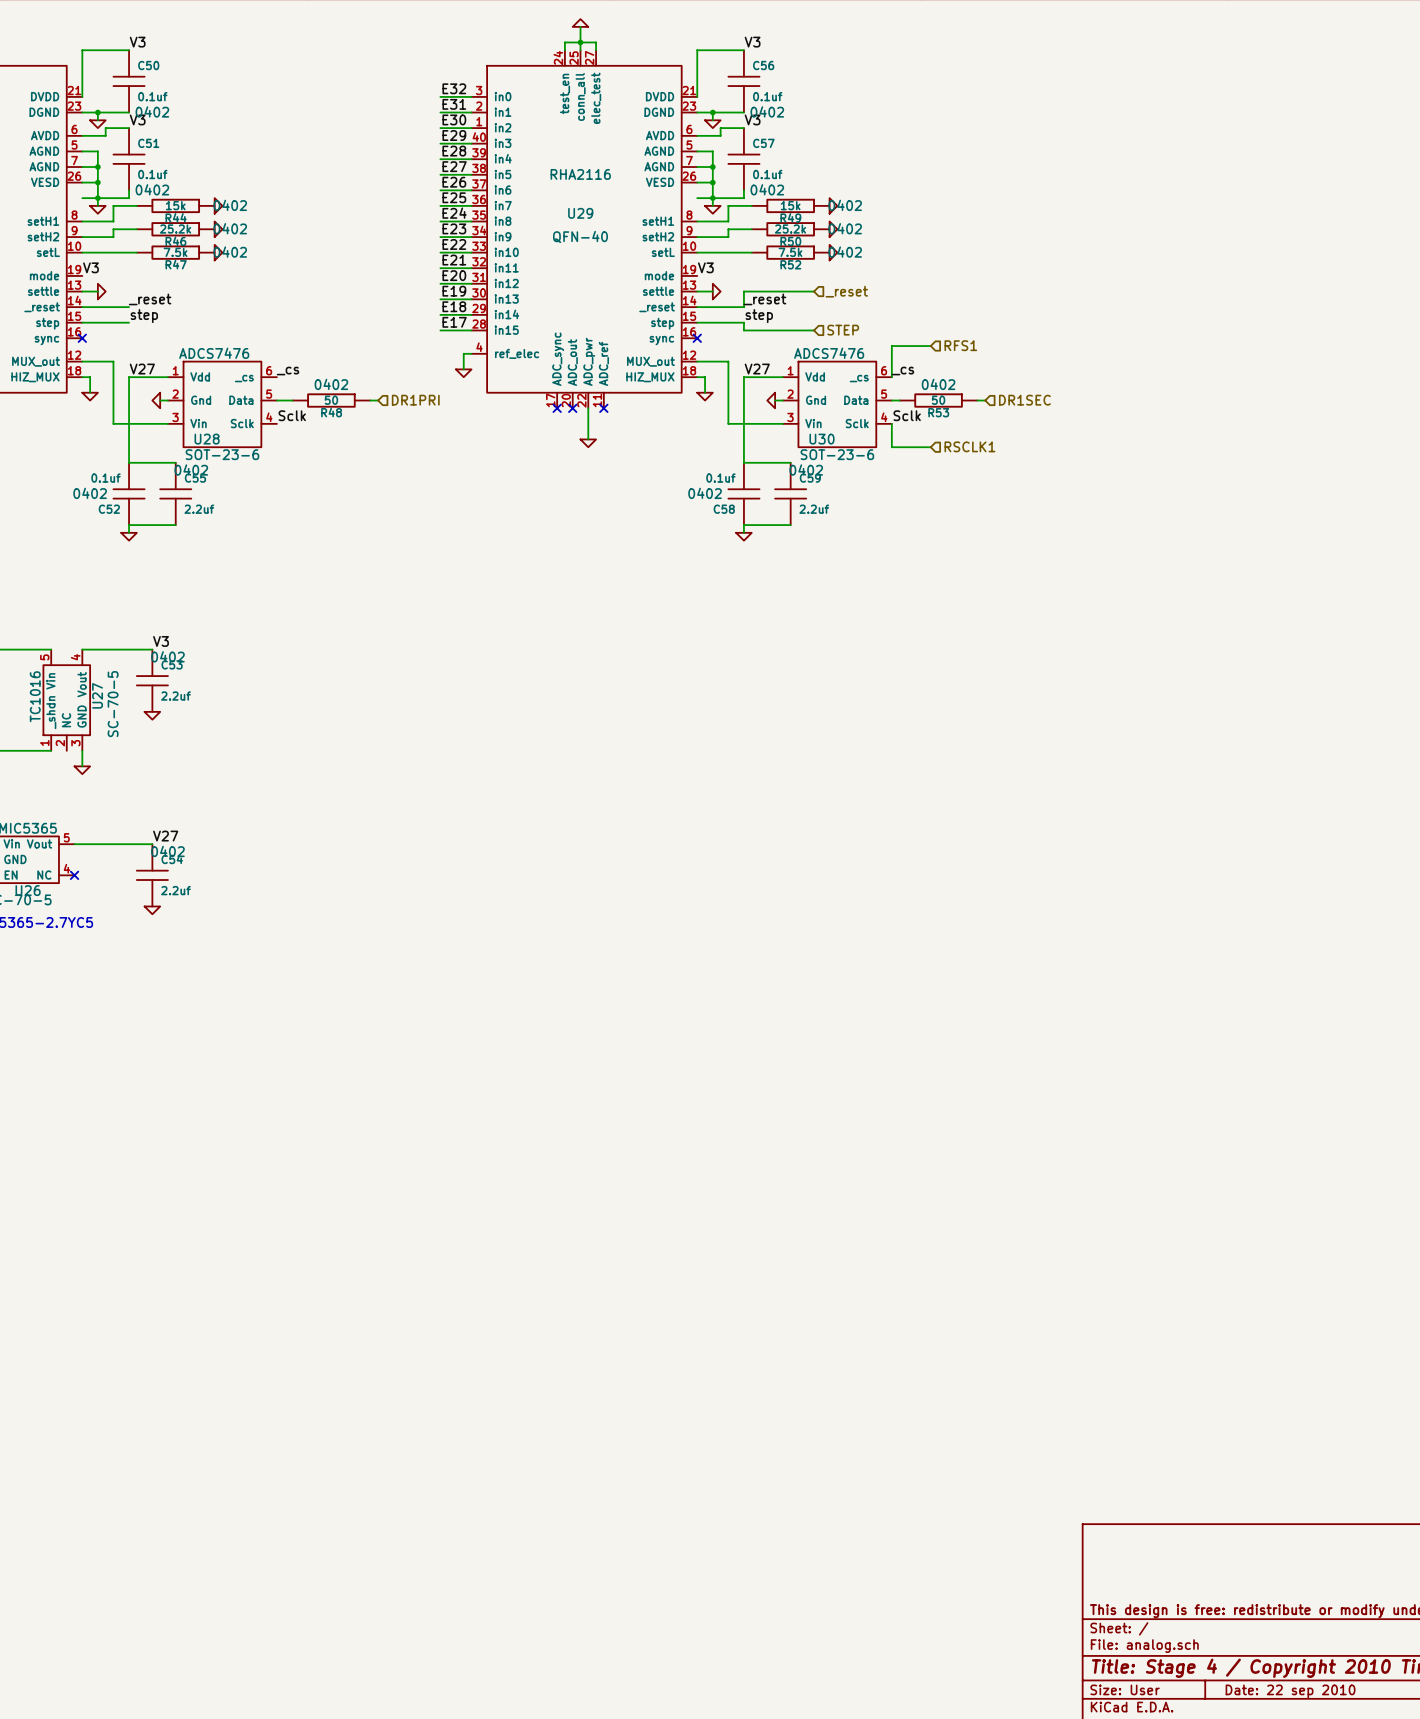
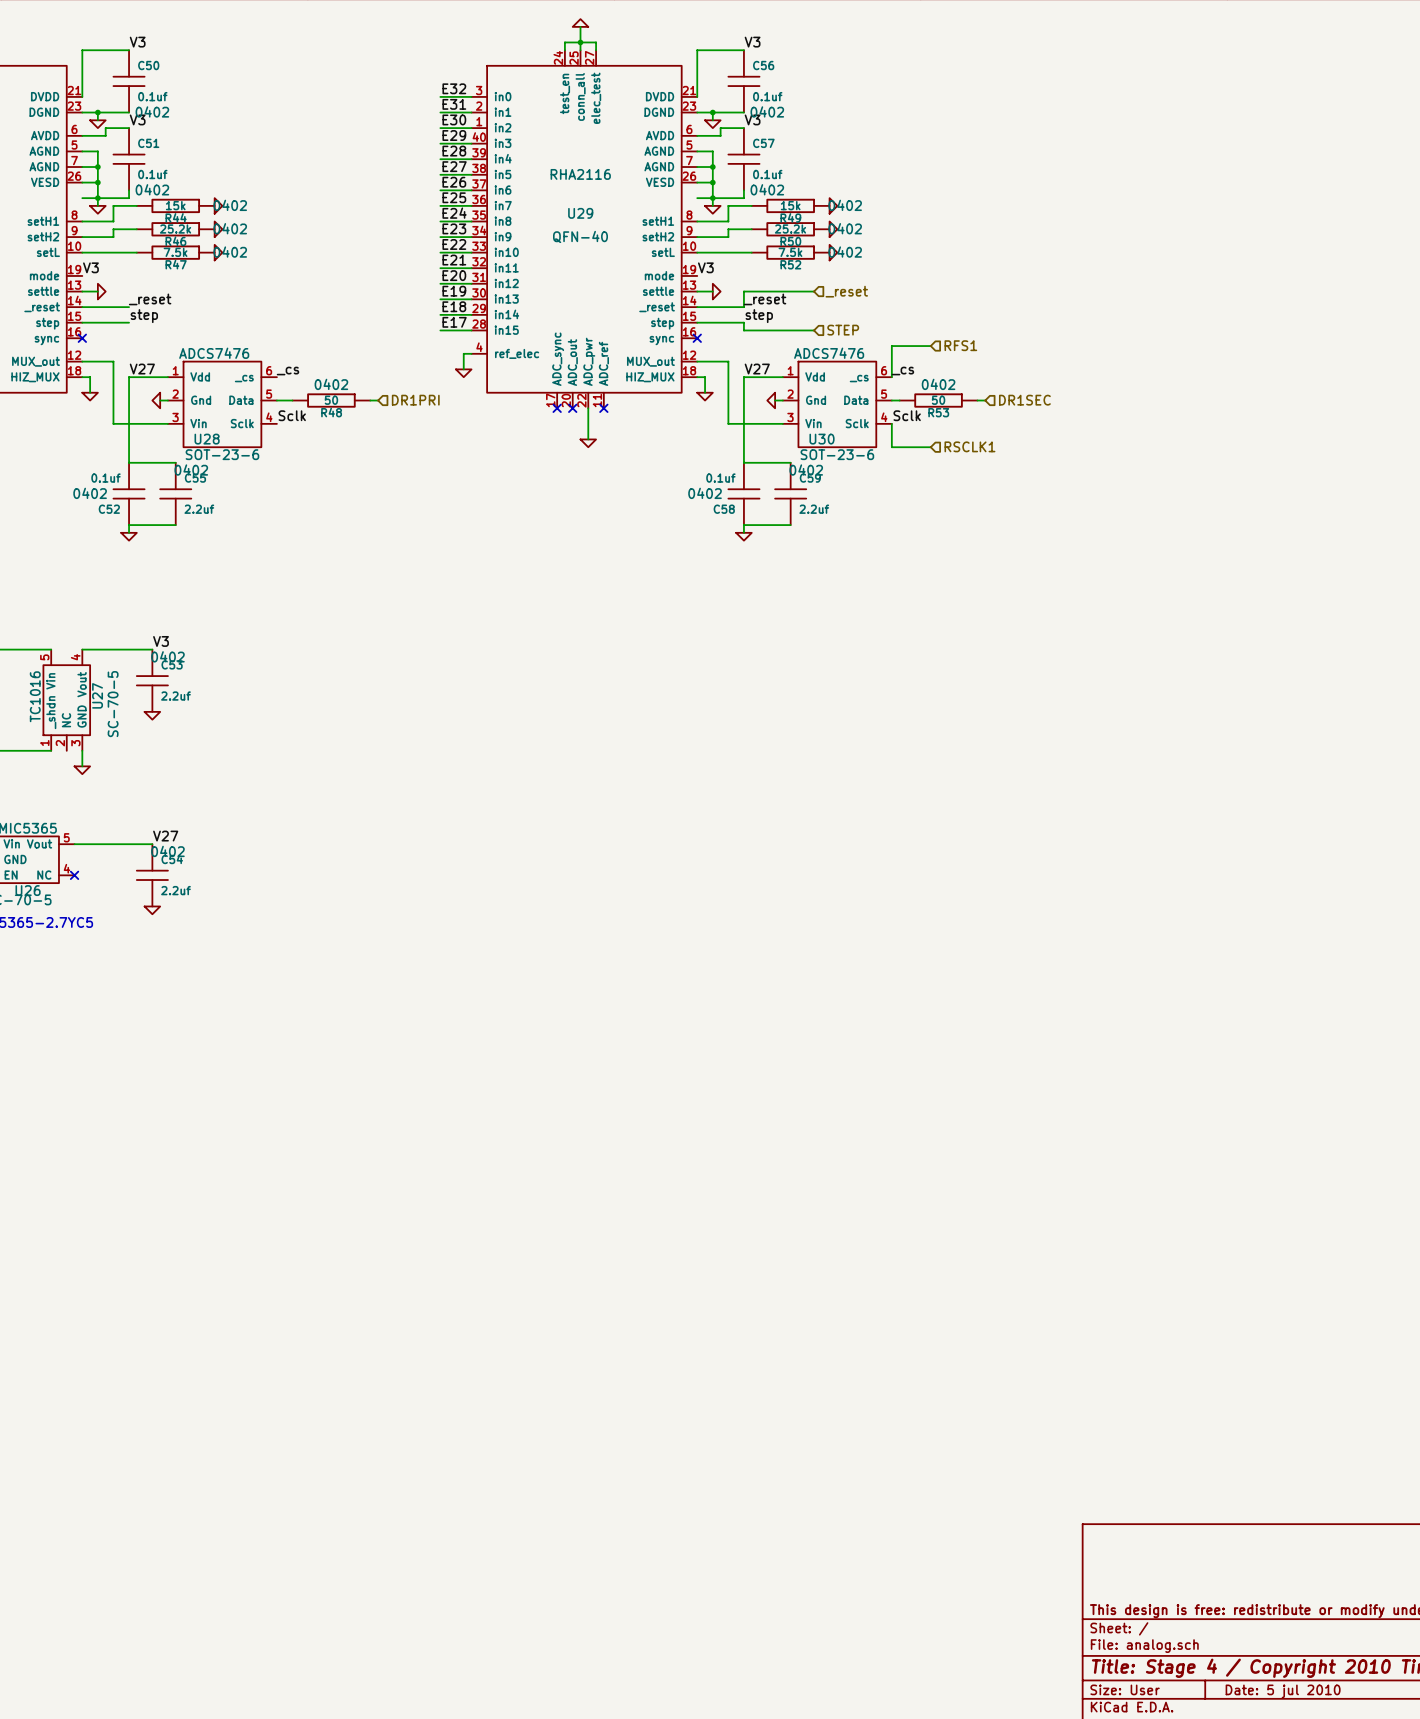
title block: Date: 22 sep 2010 (1290, 1691) -> Date: 5 jul 2010 (1283, 1691)

